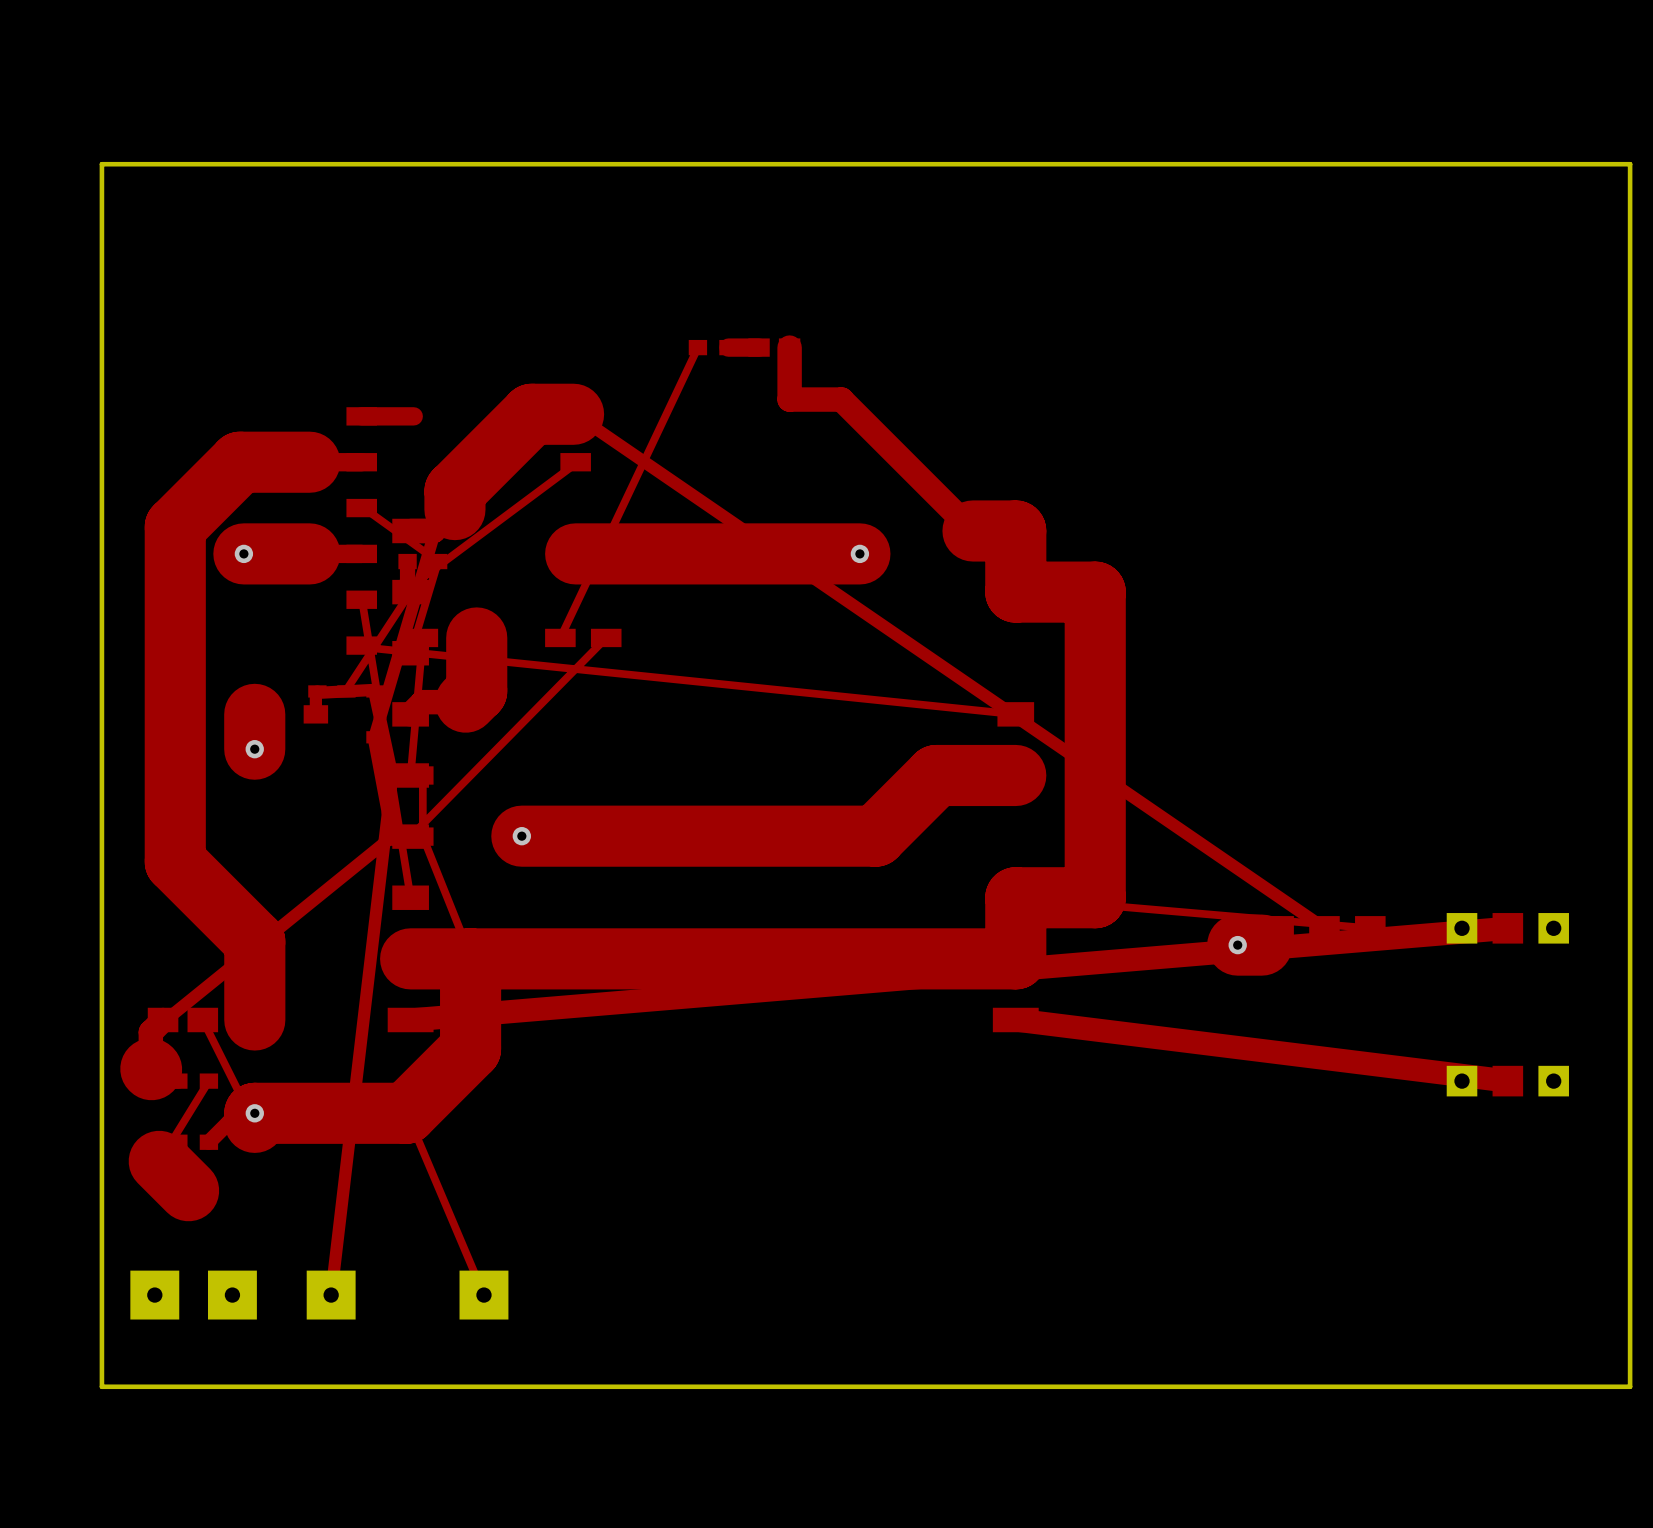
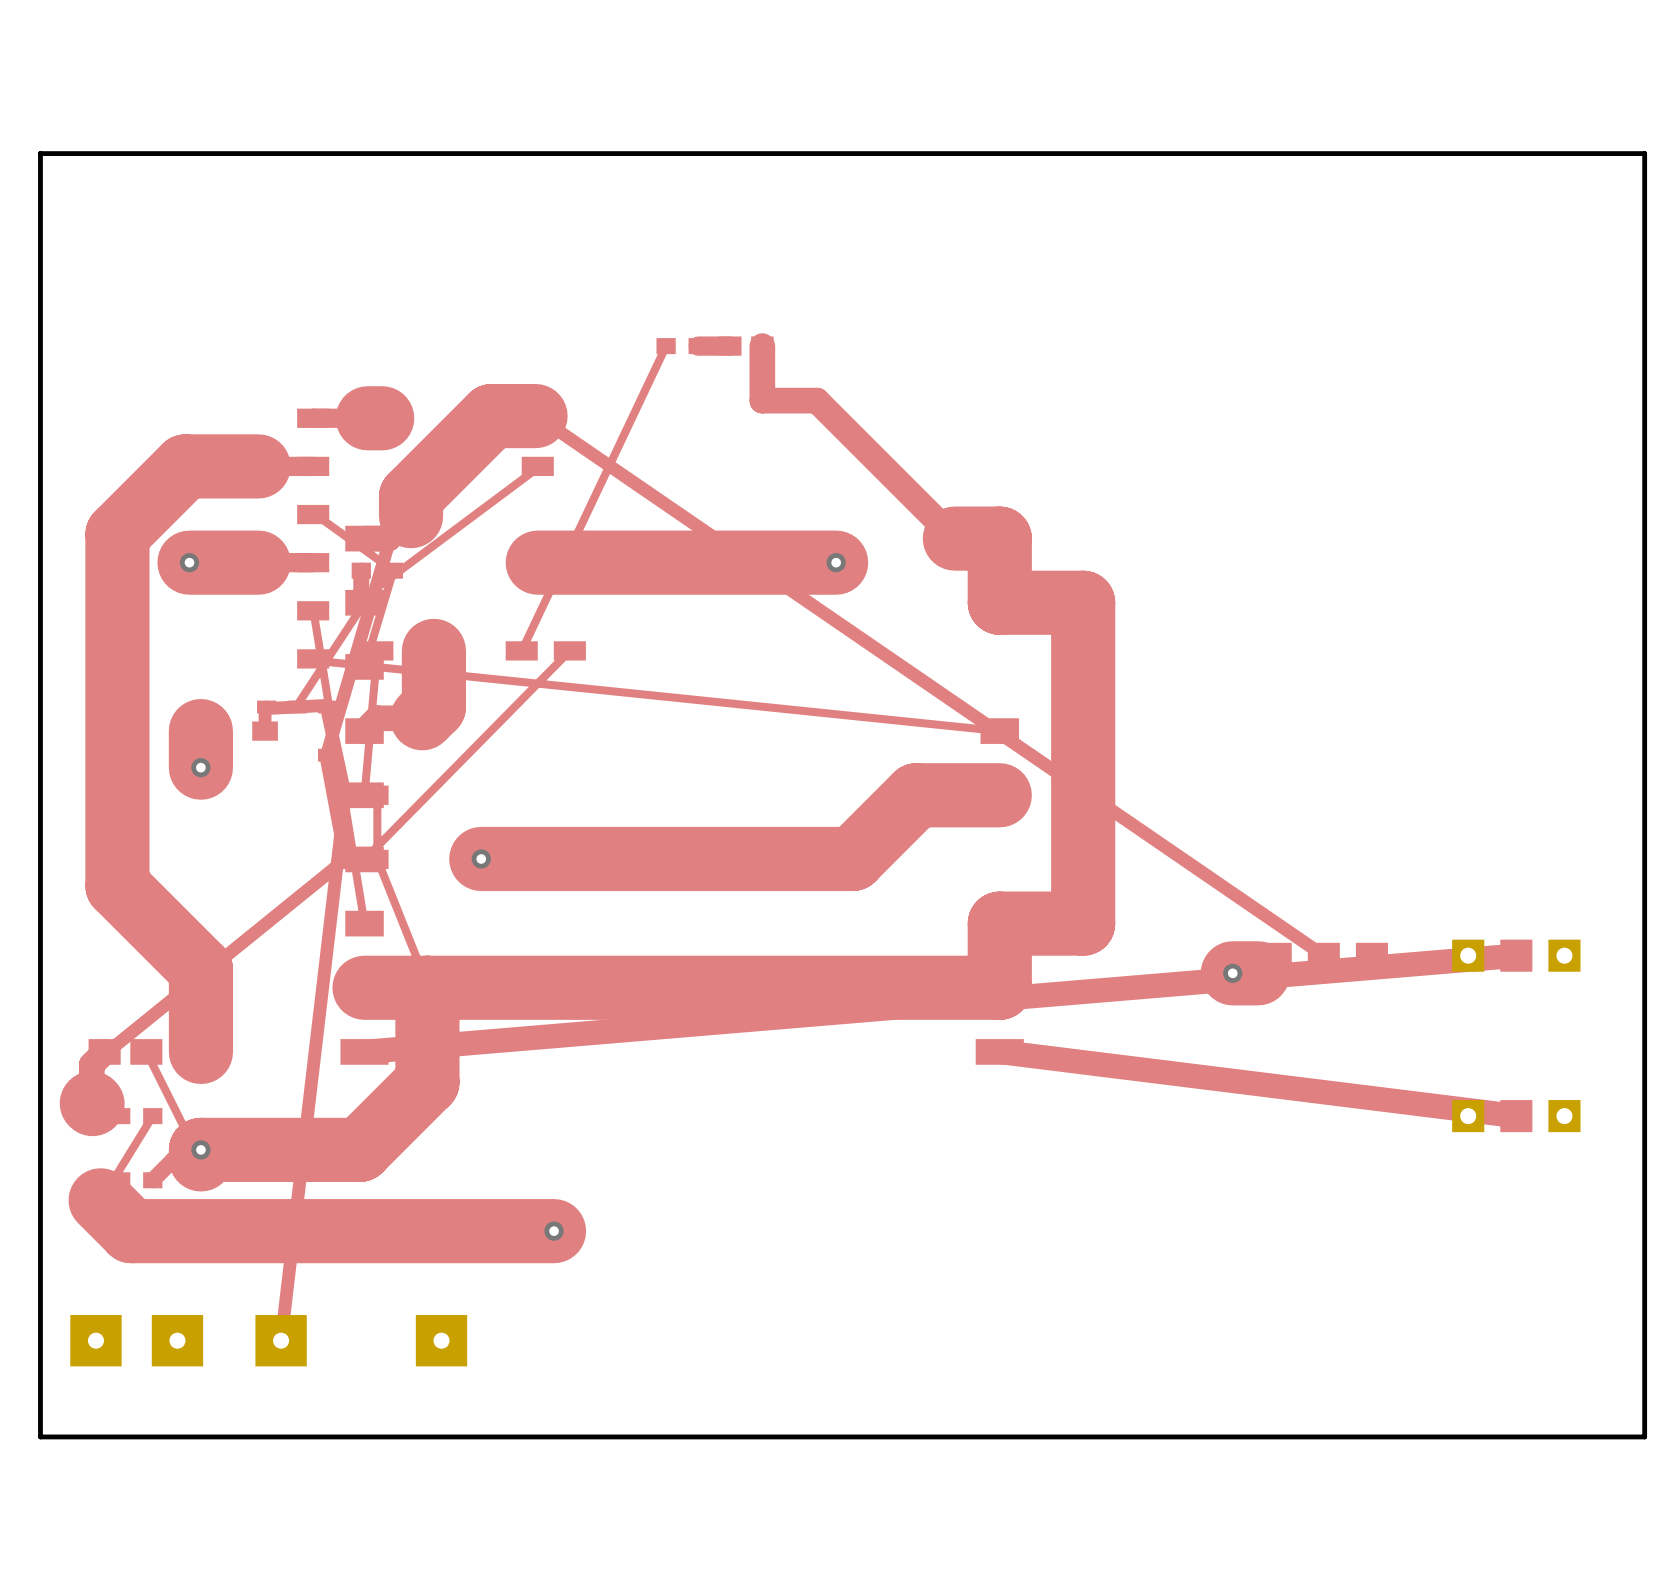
track: none -> (367, 418) (382, 418)
track: (1015, 897) (1370, 928) -> none
track: (407, 1114) (483, 1295) -> none
track: none -> (131, 1231) (554, 1231)
via: none -> (554, 1231)

